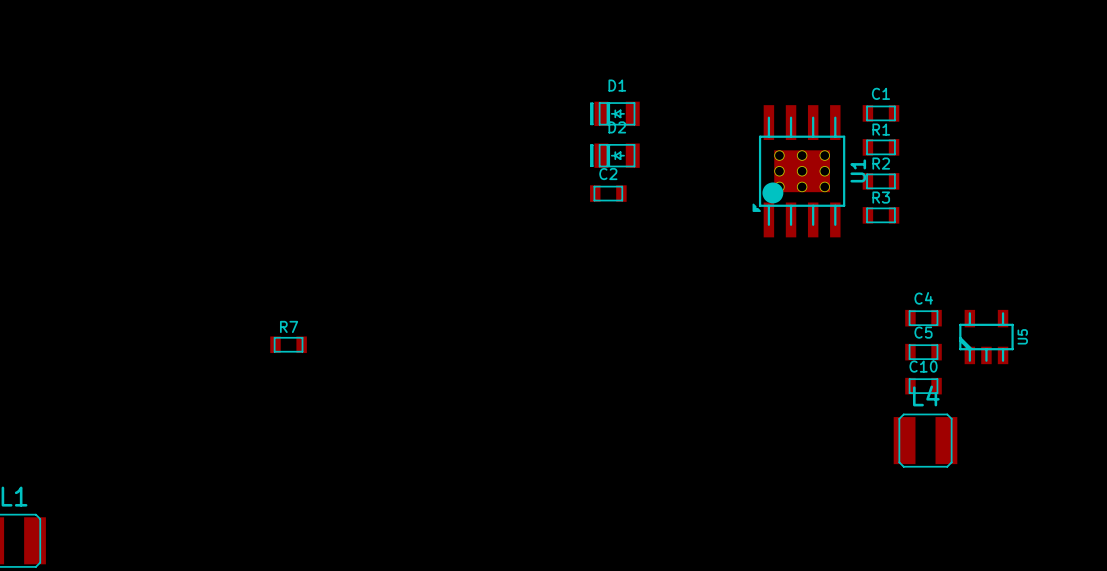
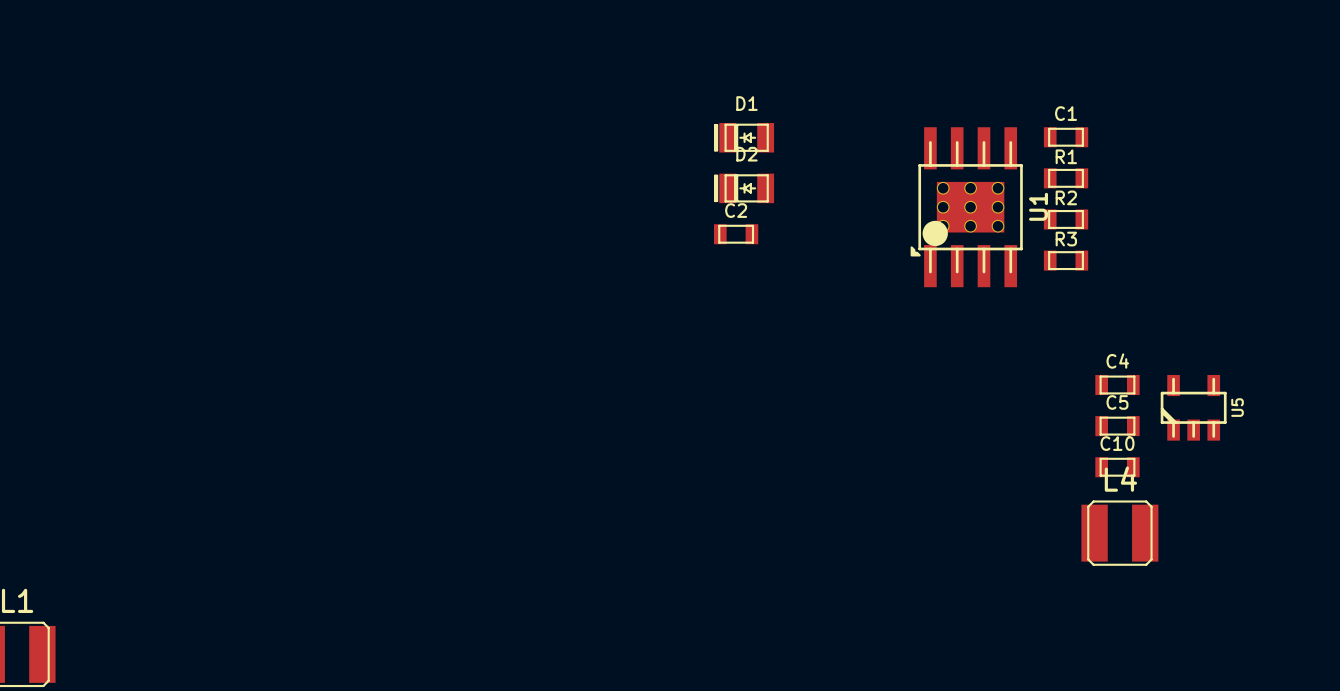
R7: (288, 344) -> none

